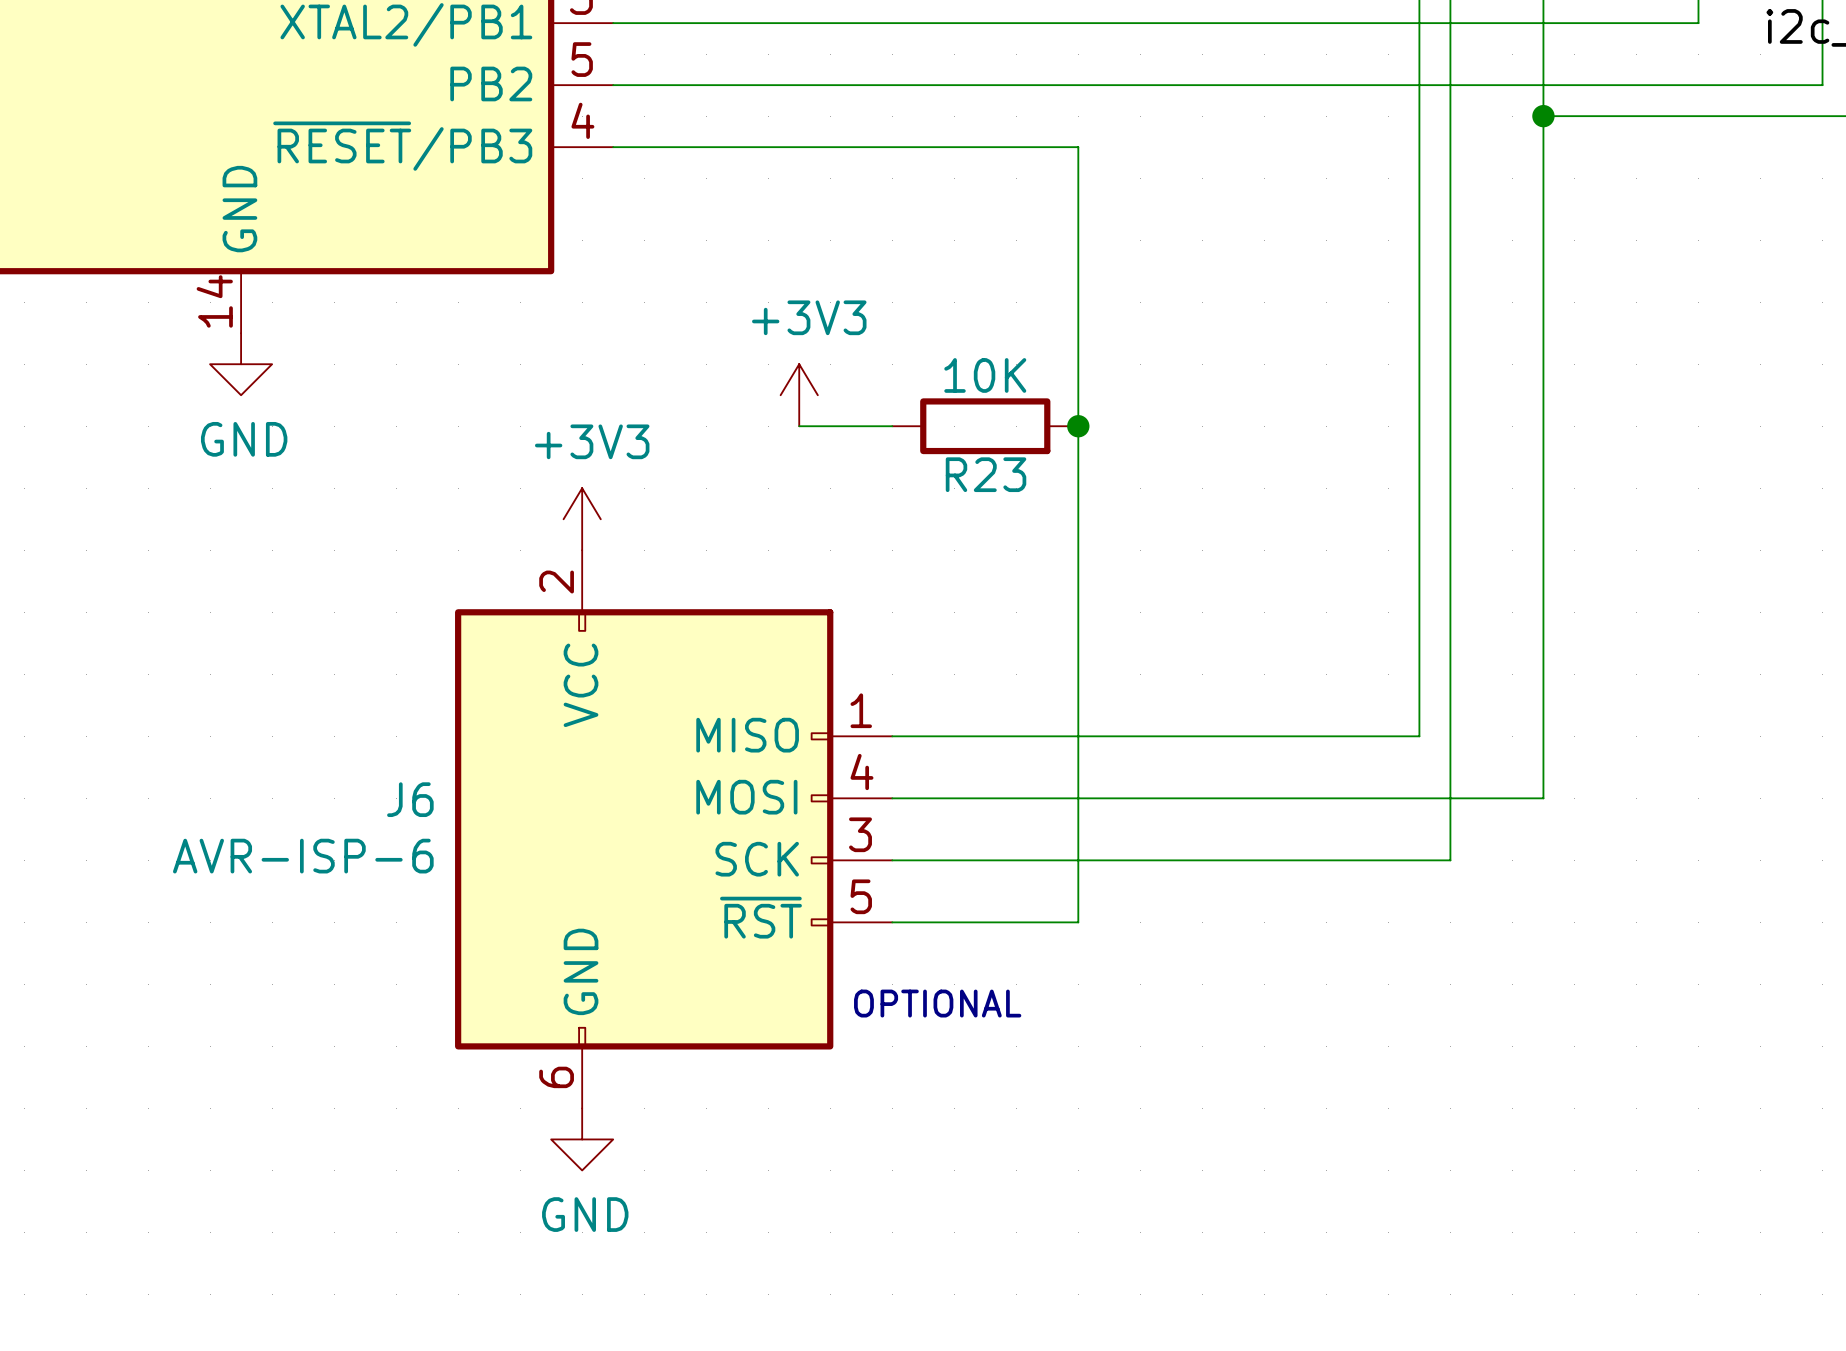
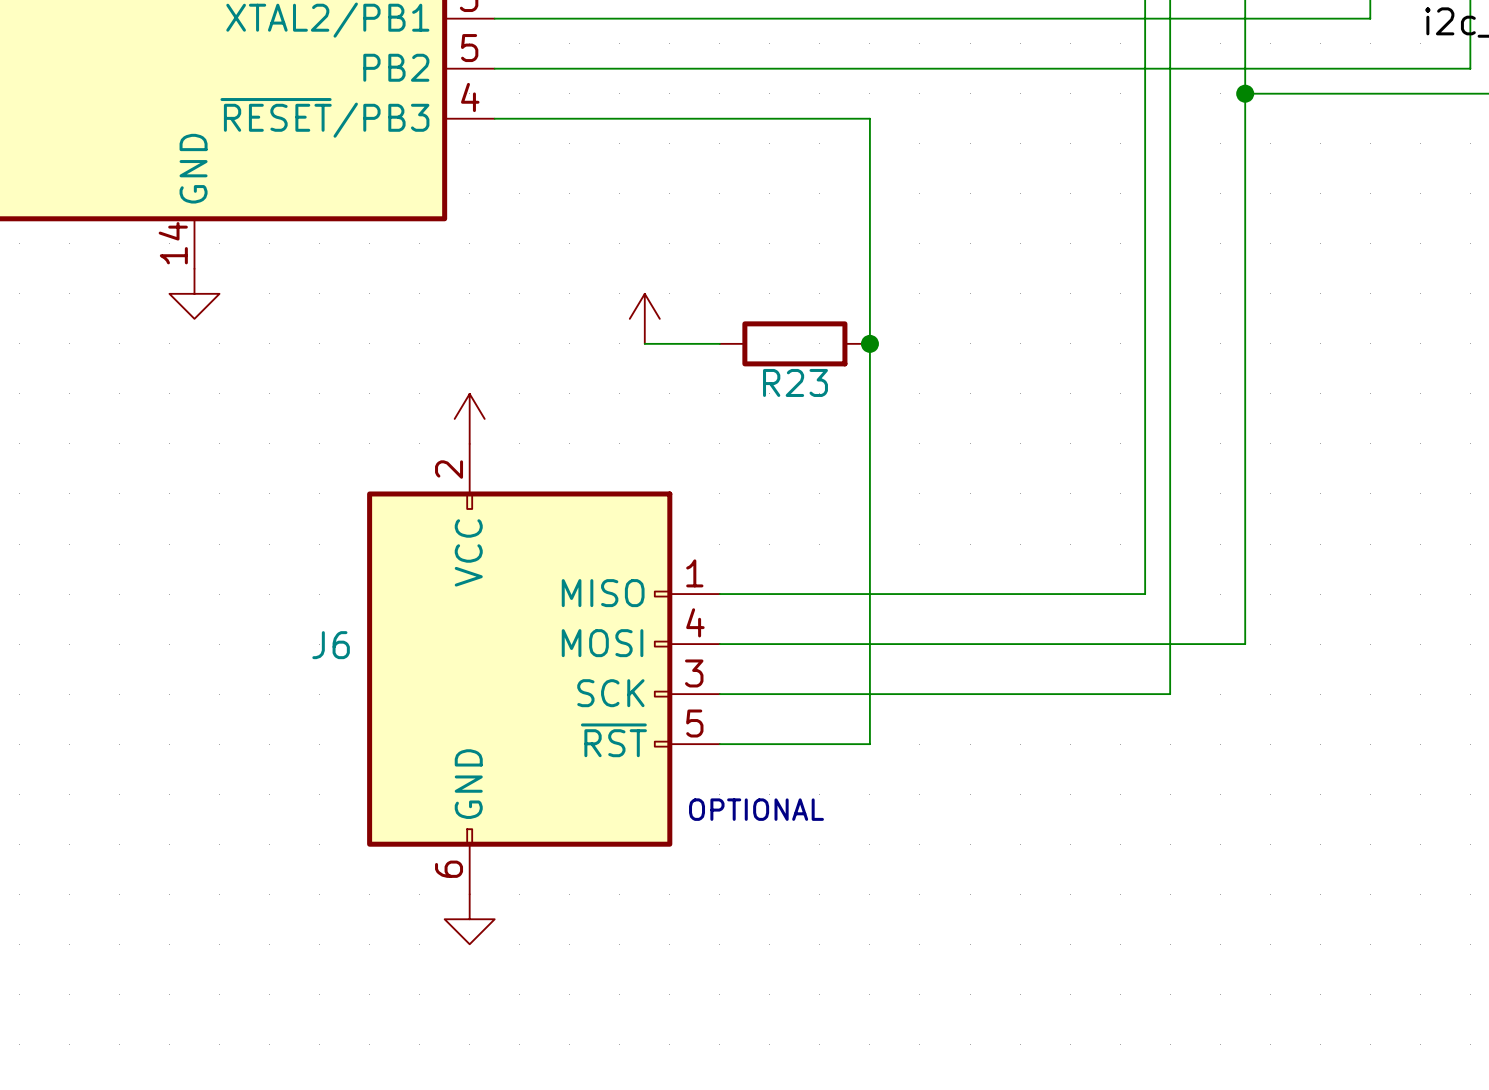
power symbol text: +3V3 (809, 317) -> none
R23 value: 10K (985, 375) -> none
power symbol text: GND (244, 439) -> none
power symbol text: +3V3 (592, 441) -> none
J6 value: AVR-ISP-6 (303, 856) -> none
power symbol text: GND (585, 1214) -> none

